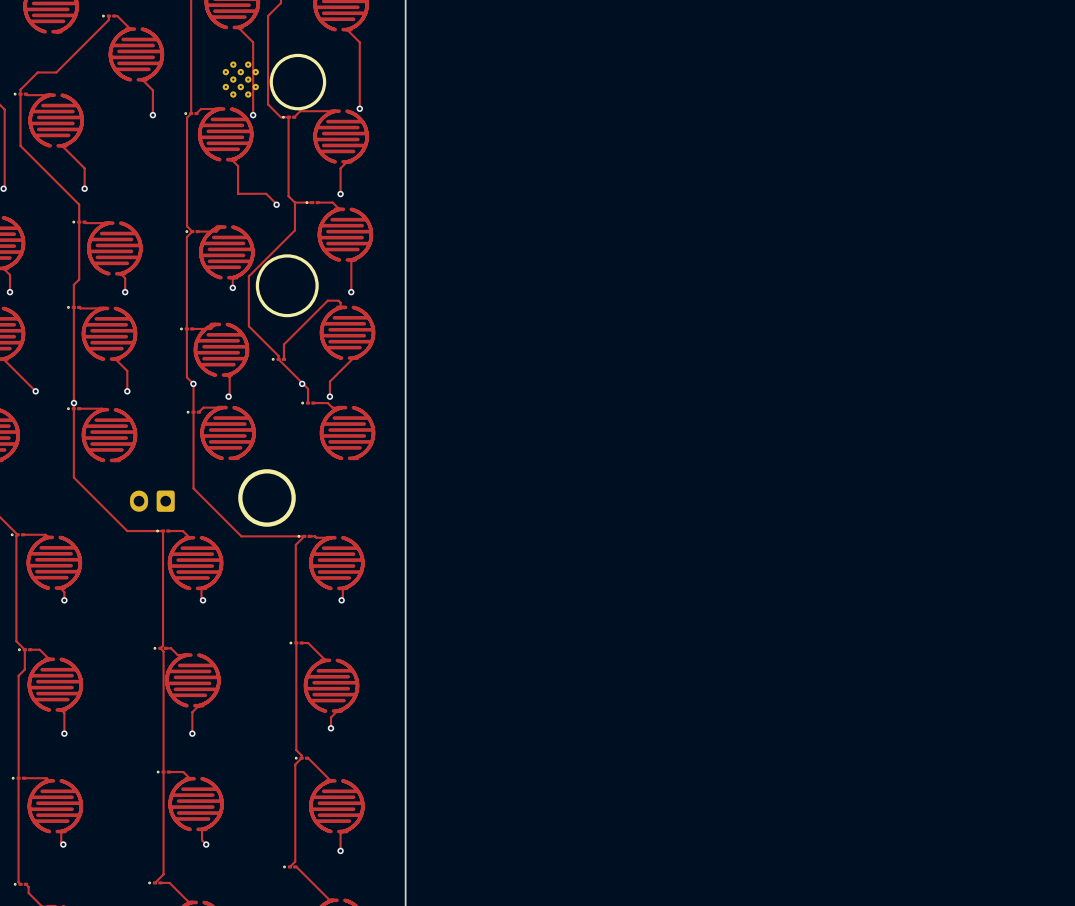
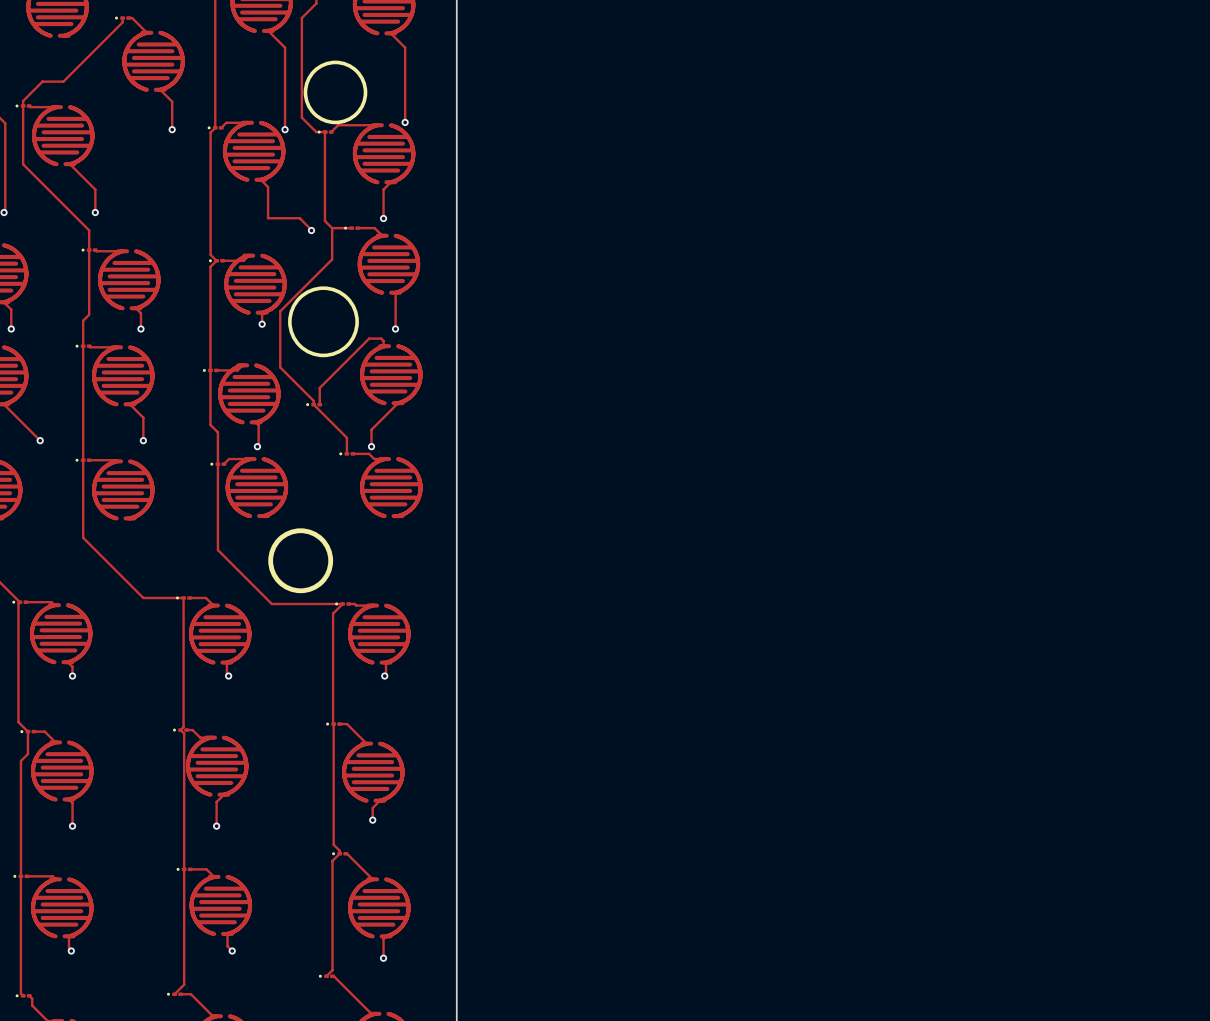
part: (240, 79) -> none
via: (193, 383) -> none
via: (302, 383) -> none
via: (73, 403) -> none
part: (152, 501) -> none

